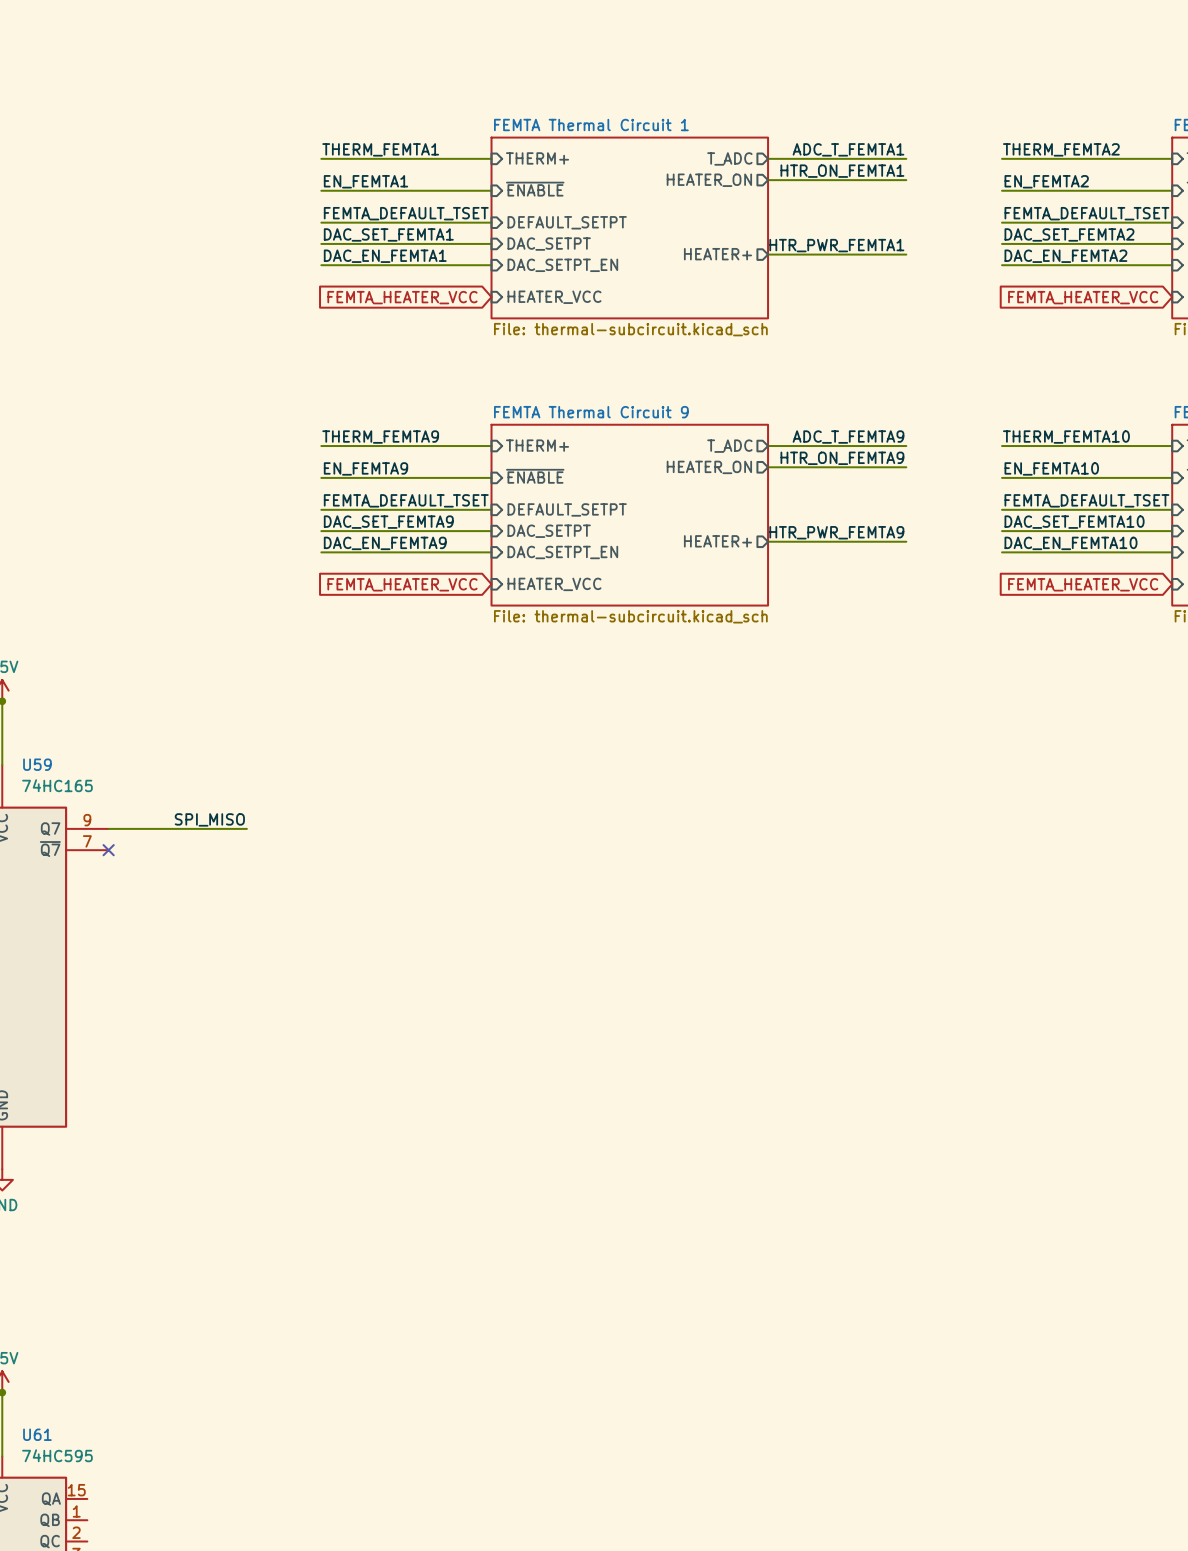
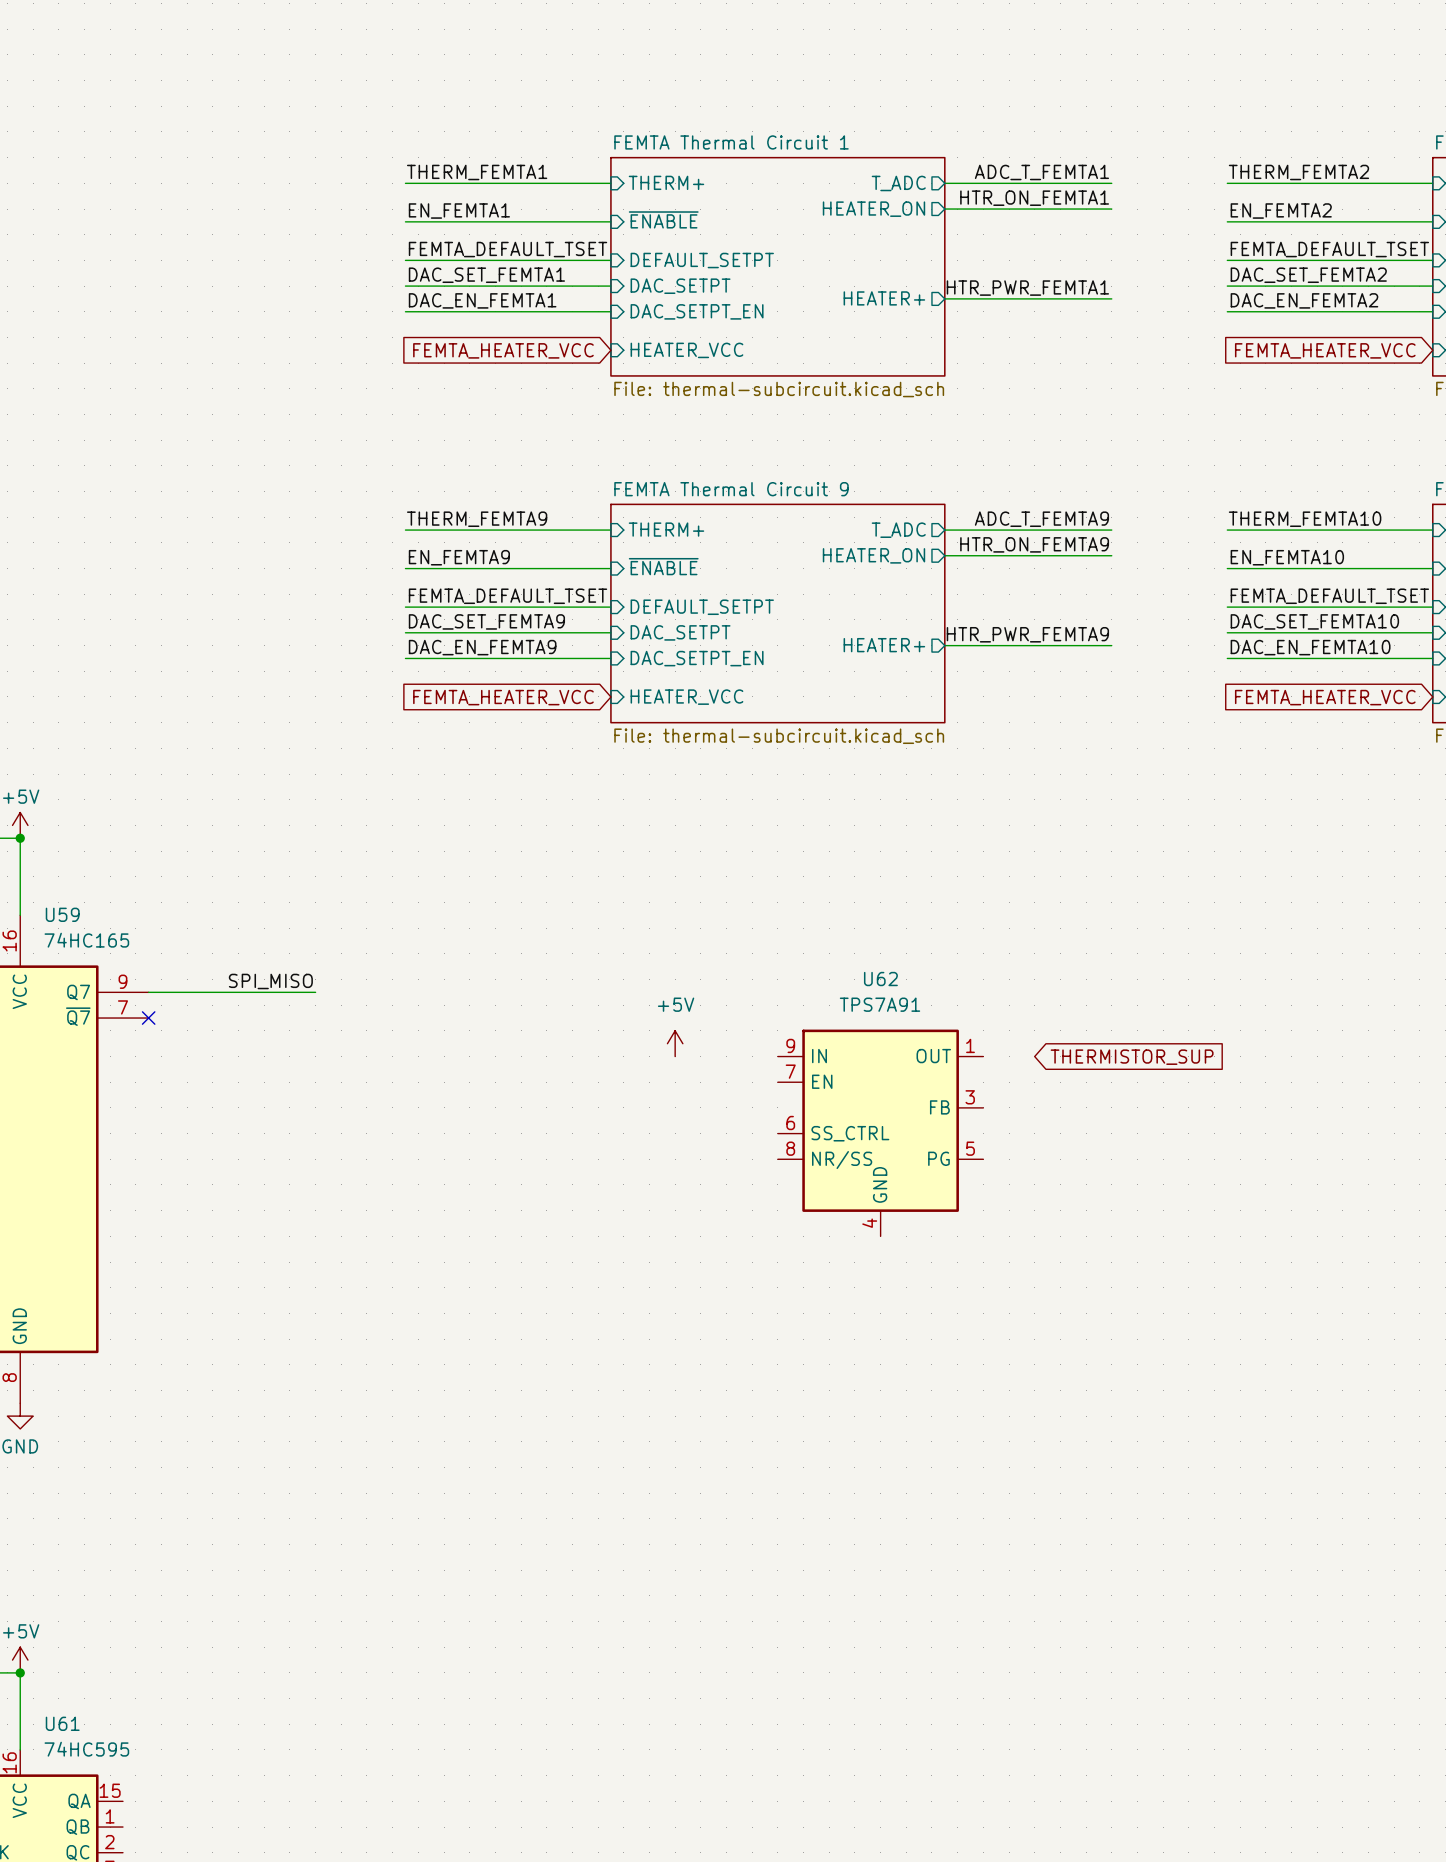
power symbol: none -> +5V (675, 1043)
global label: none -> THERMISTOR_SUP (1132, 1057)
U62: none -> TPS7A91 (880, 1132)

